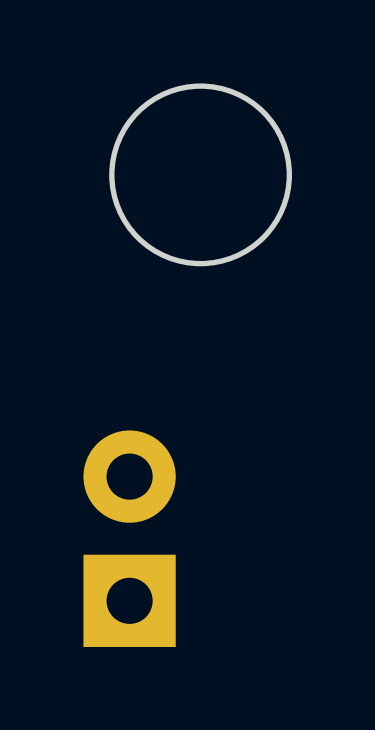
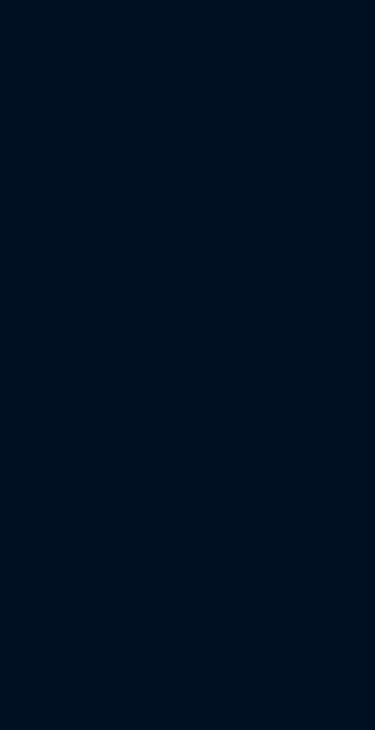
round board edge: [109, 83, 293, 267] -> none
part: (129, 538) -> none

